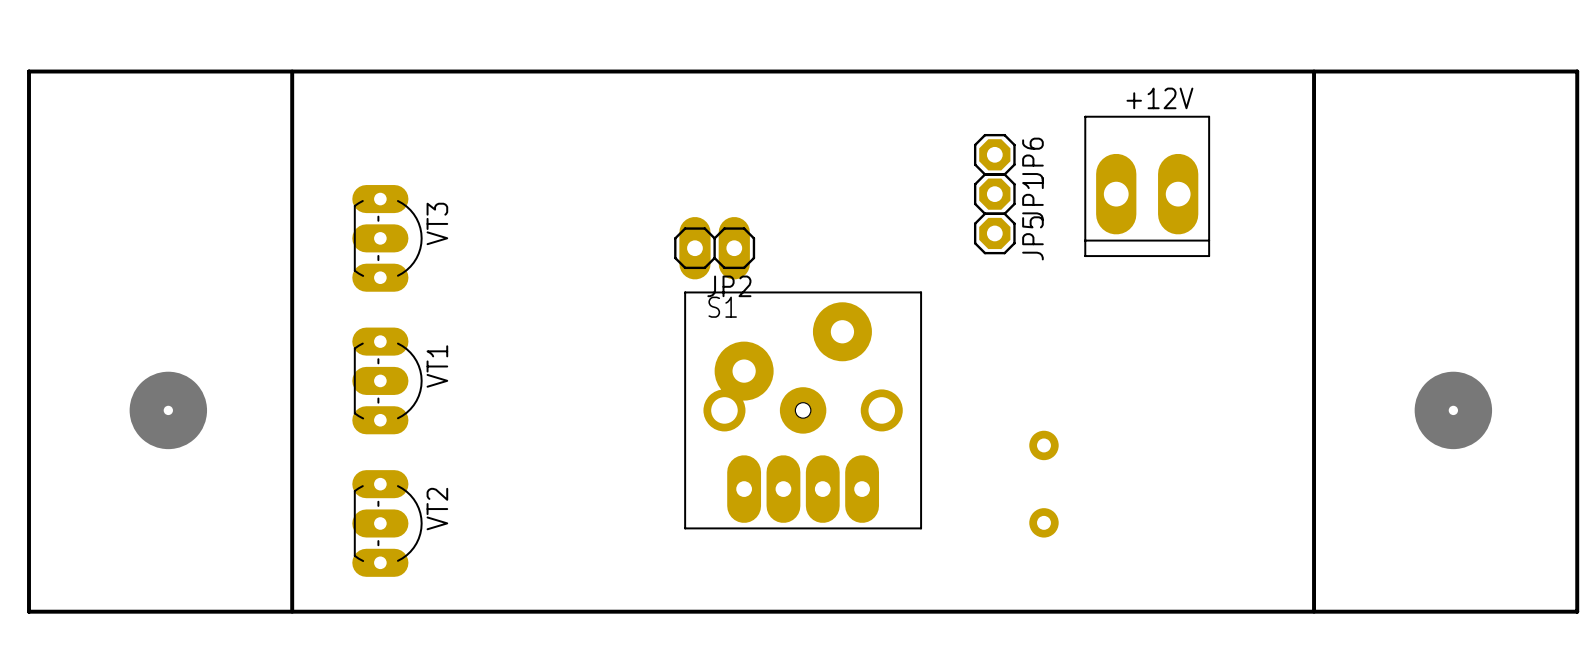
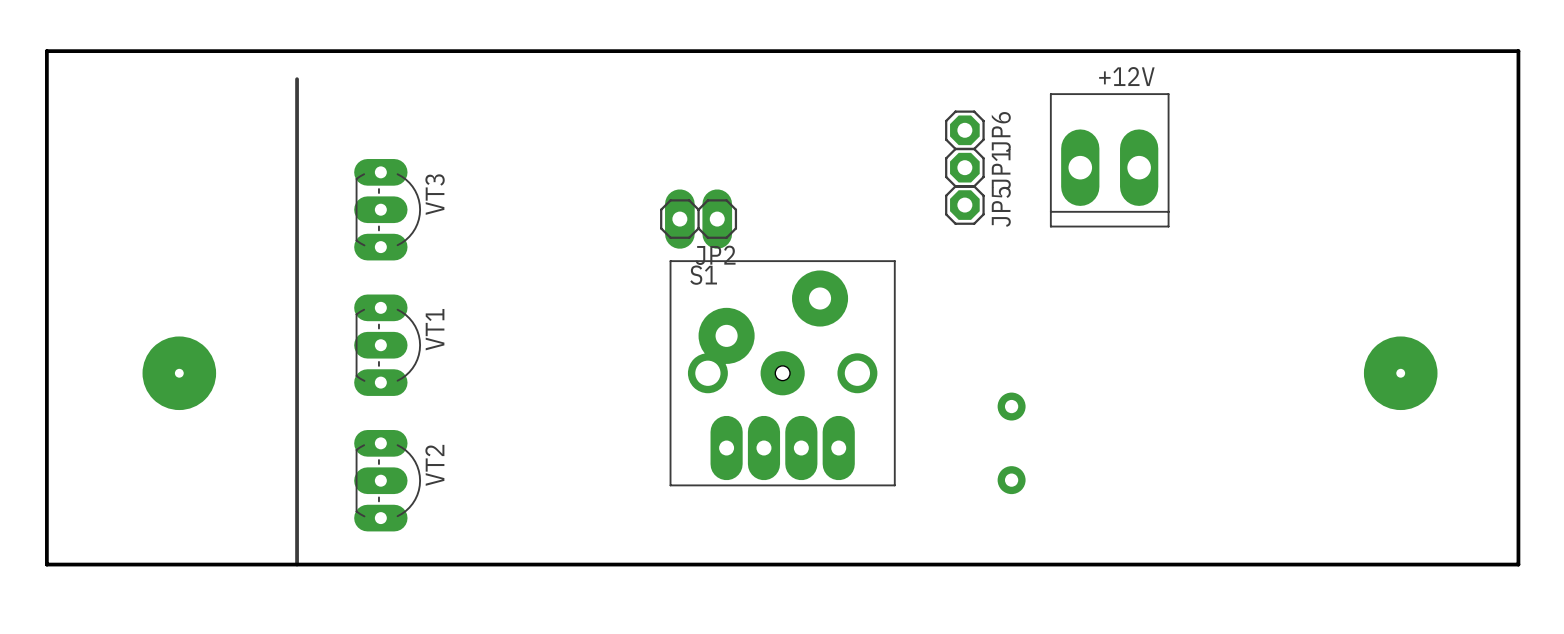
line: (292, 71) (292, 101) -> none
line: (1314, 71) (1314, 611) -> none

